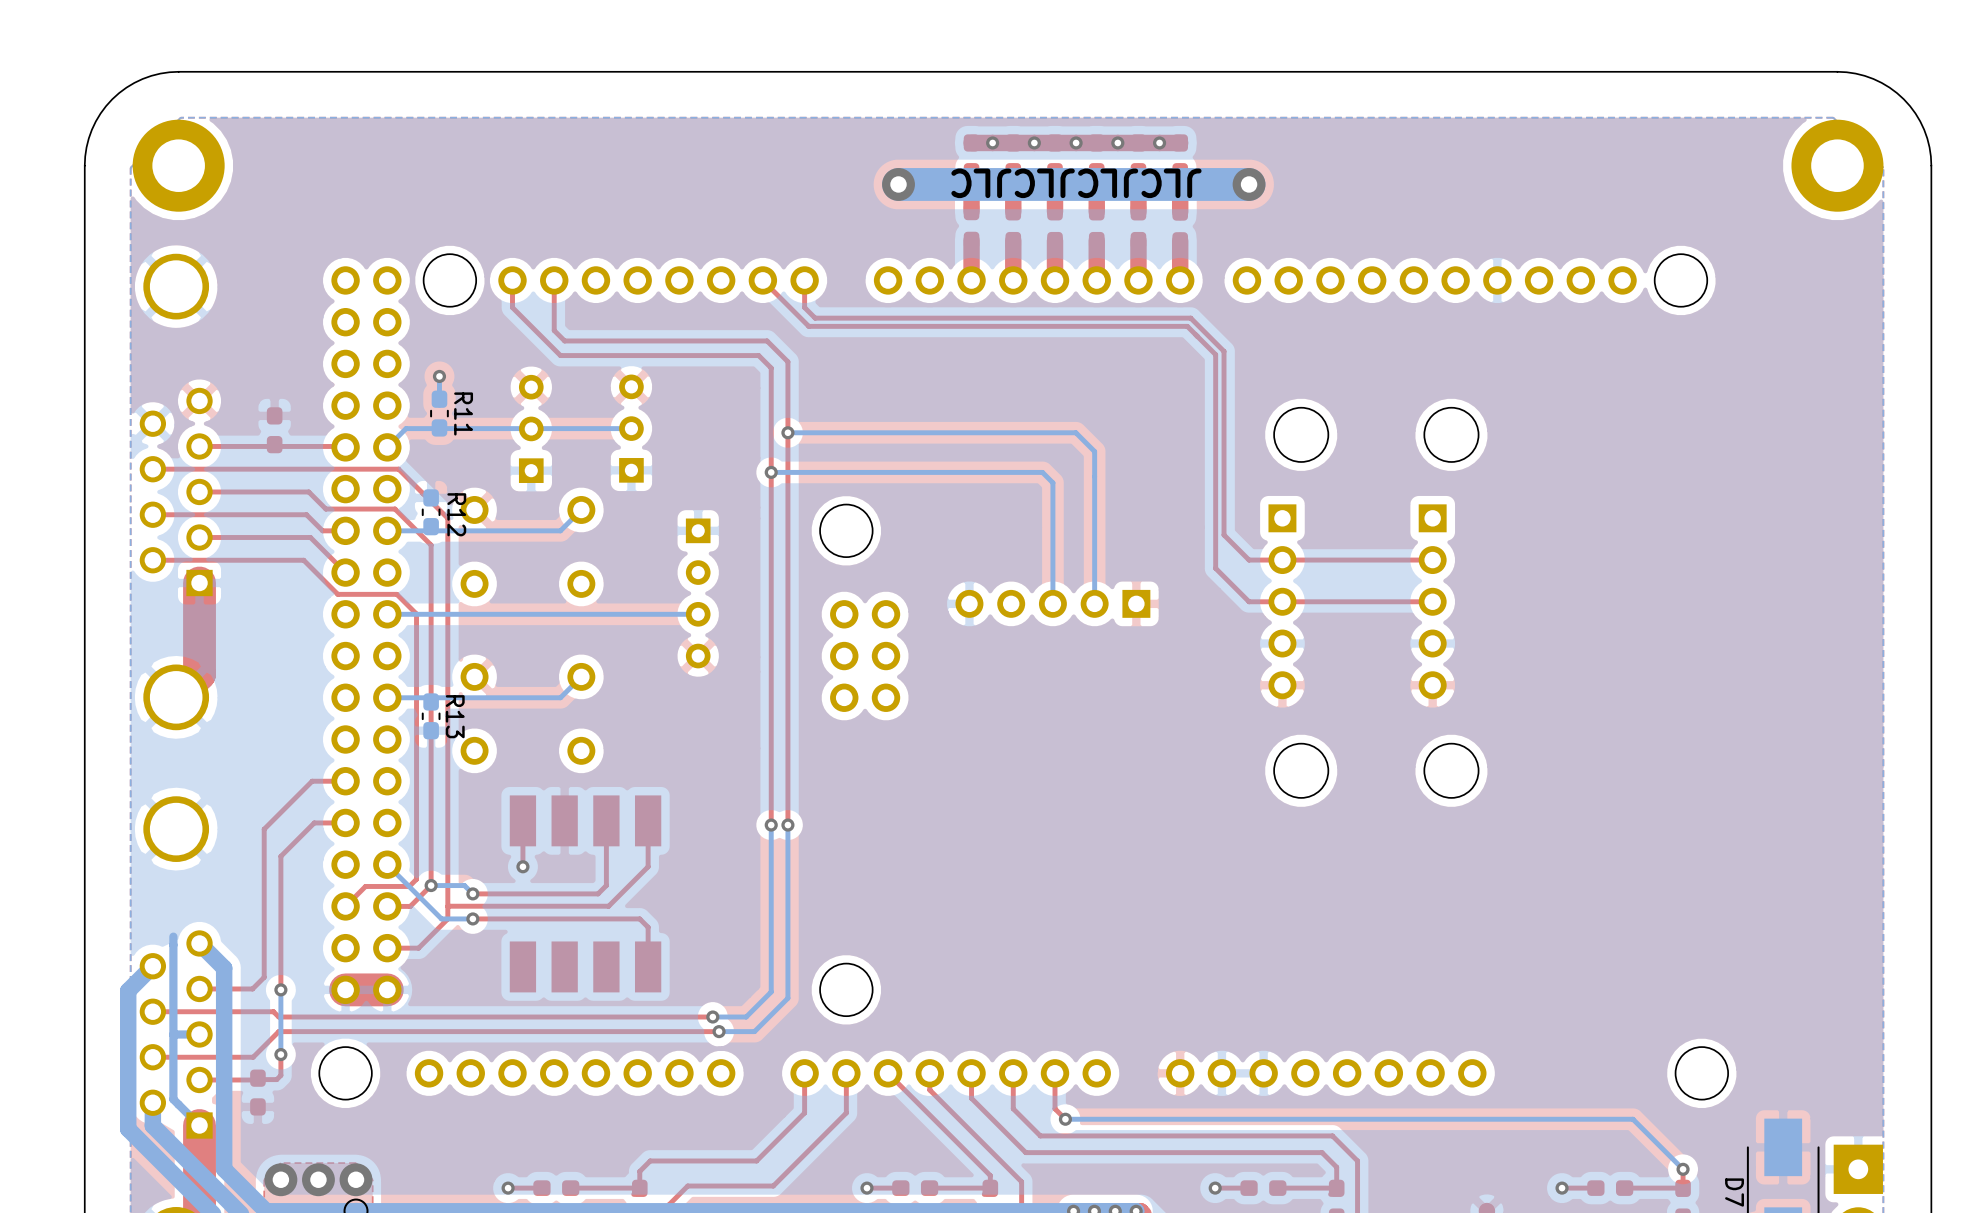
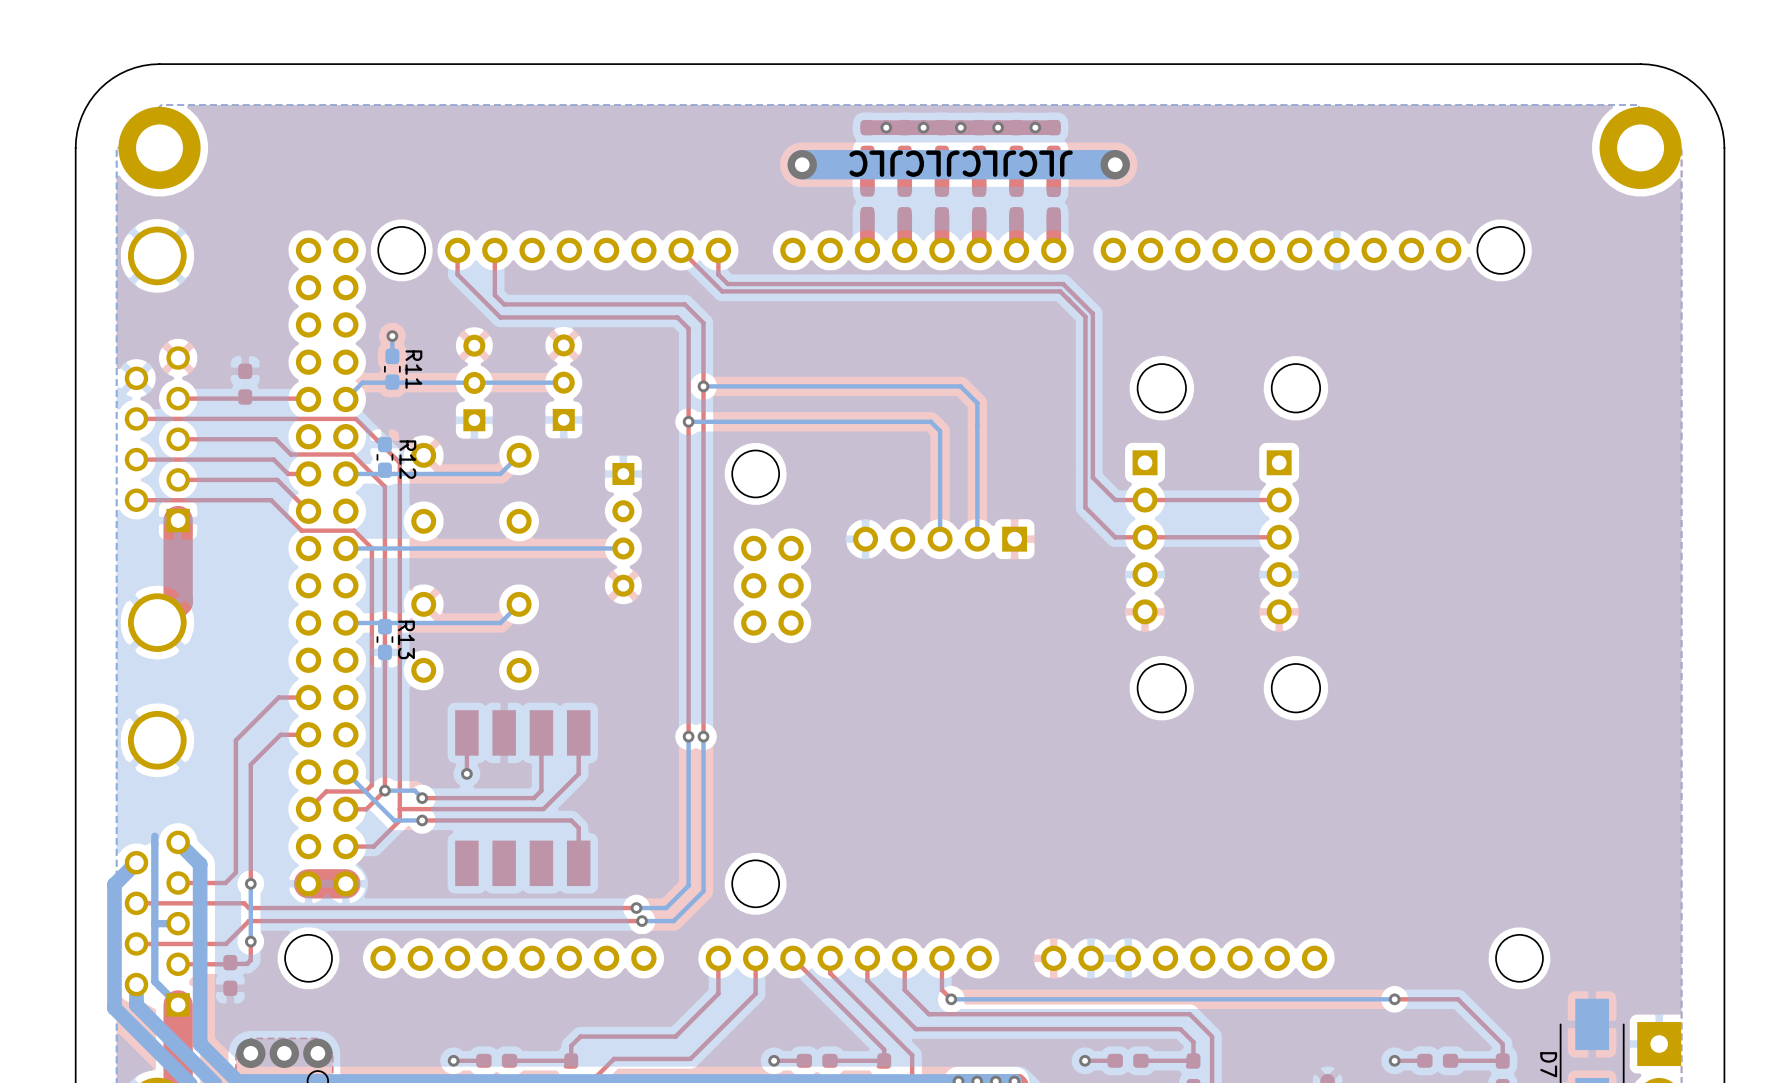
top track: none -> (1394, 999) (1458, 999) (1502, 1044)
bottom track: (1562, 1119) (1632, 1119) (1683, 1169) -> none
via: none -> (1394, 999)
via: (1683, 1169) -> none

